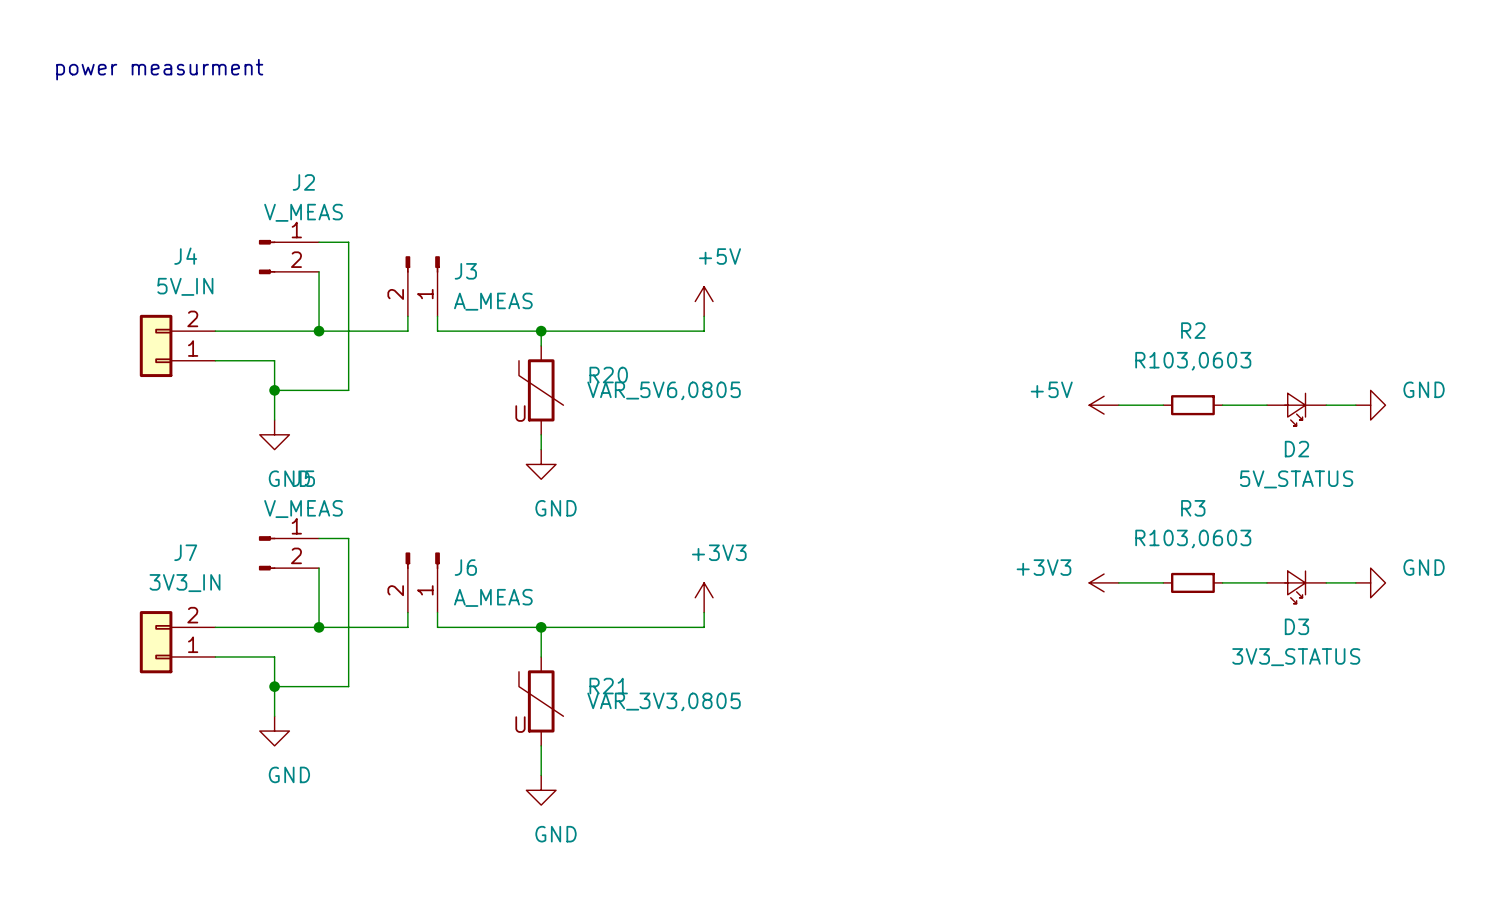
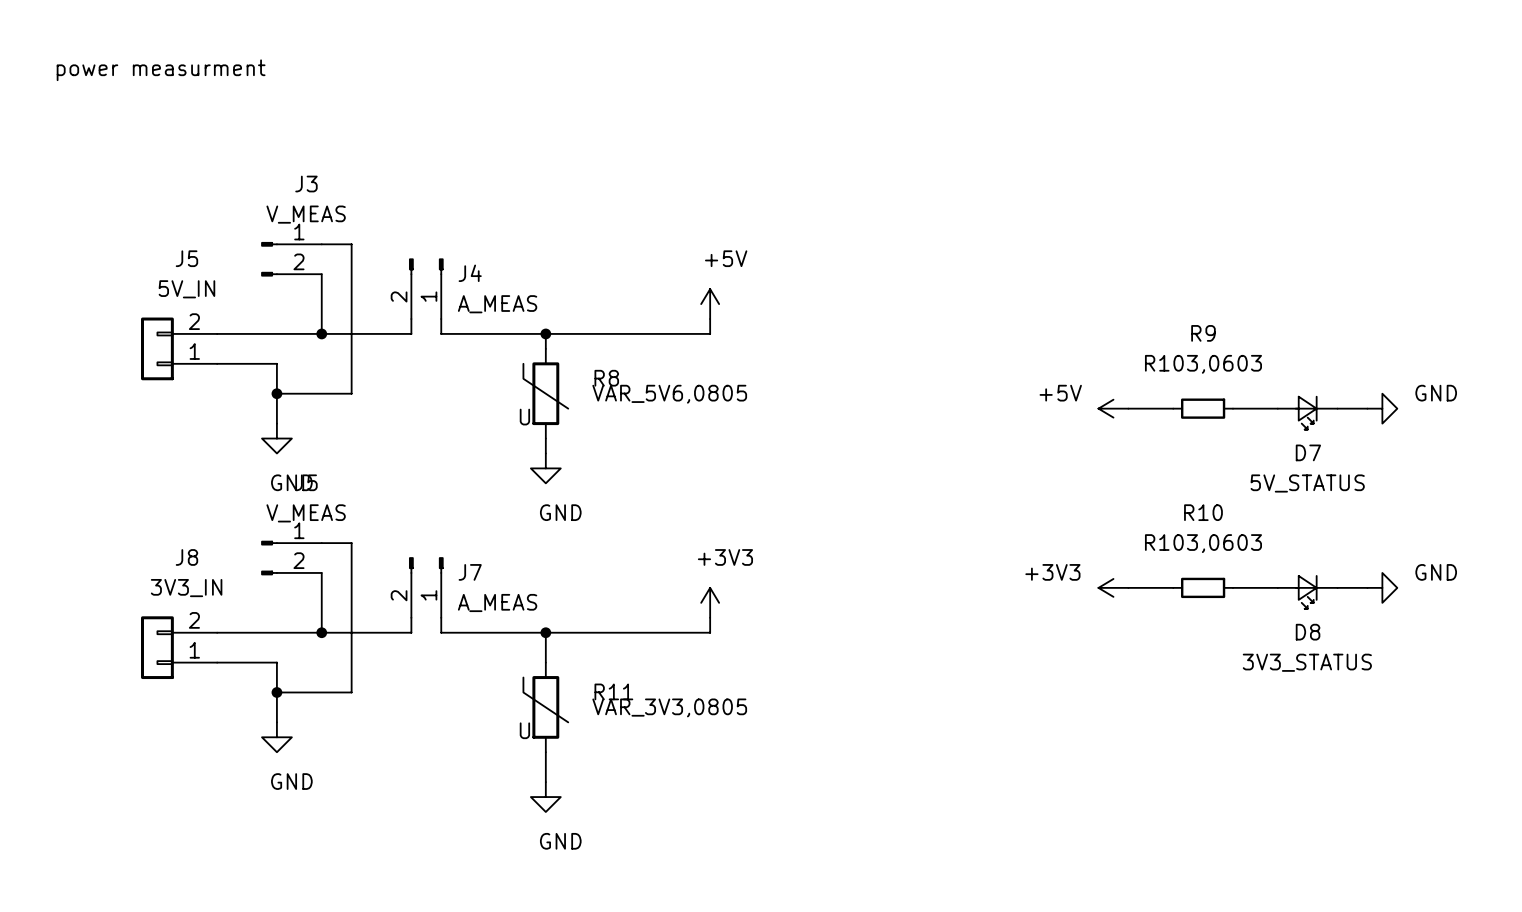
J2 name: J2 (303, 182) -> J3 (306, 184)
J4 name: J4 (185, 256) -> J5 (186, 258)
J3 name: J3 (465, 271) -> J4 (470, 273)
R2 name: R2 (1193, 330) -> R9 (1203, 333)
R20 name: R20 (608, 375) -> R8 (606, 378)
D2 name: D2 (1296, 449) -> D7 (1308, 452)
R3 name: R3 (1193, 508) -> R10 (1203, 512)
J7 name: J7 (185, 552) -> J8 (186, 557)
J6 name: J6 (465, 567) -> J7 (470, 572)
D3 name: D3 (1296, 626) -> D8 (1308, 632)
R21 name: R21 (608, 686) -> R11 (613, 691)

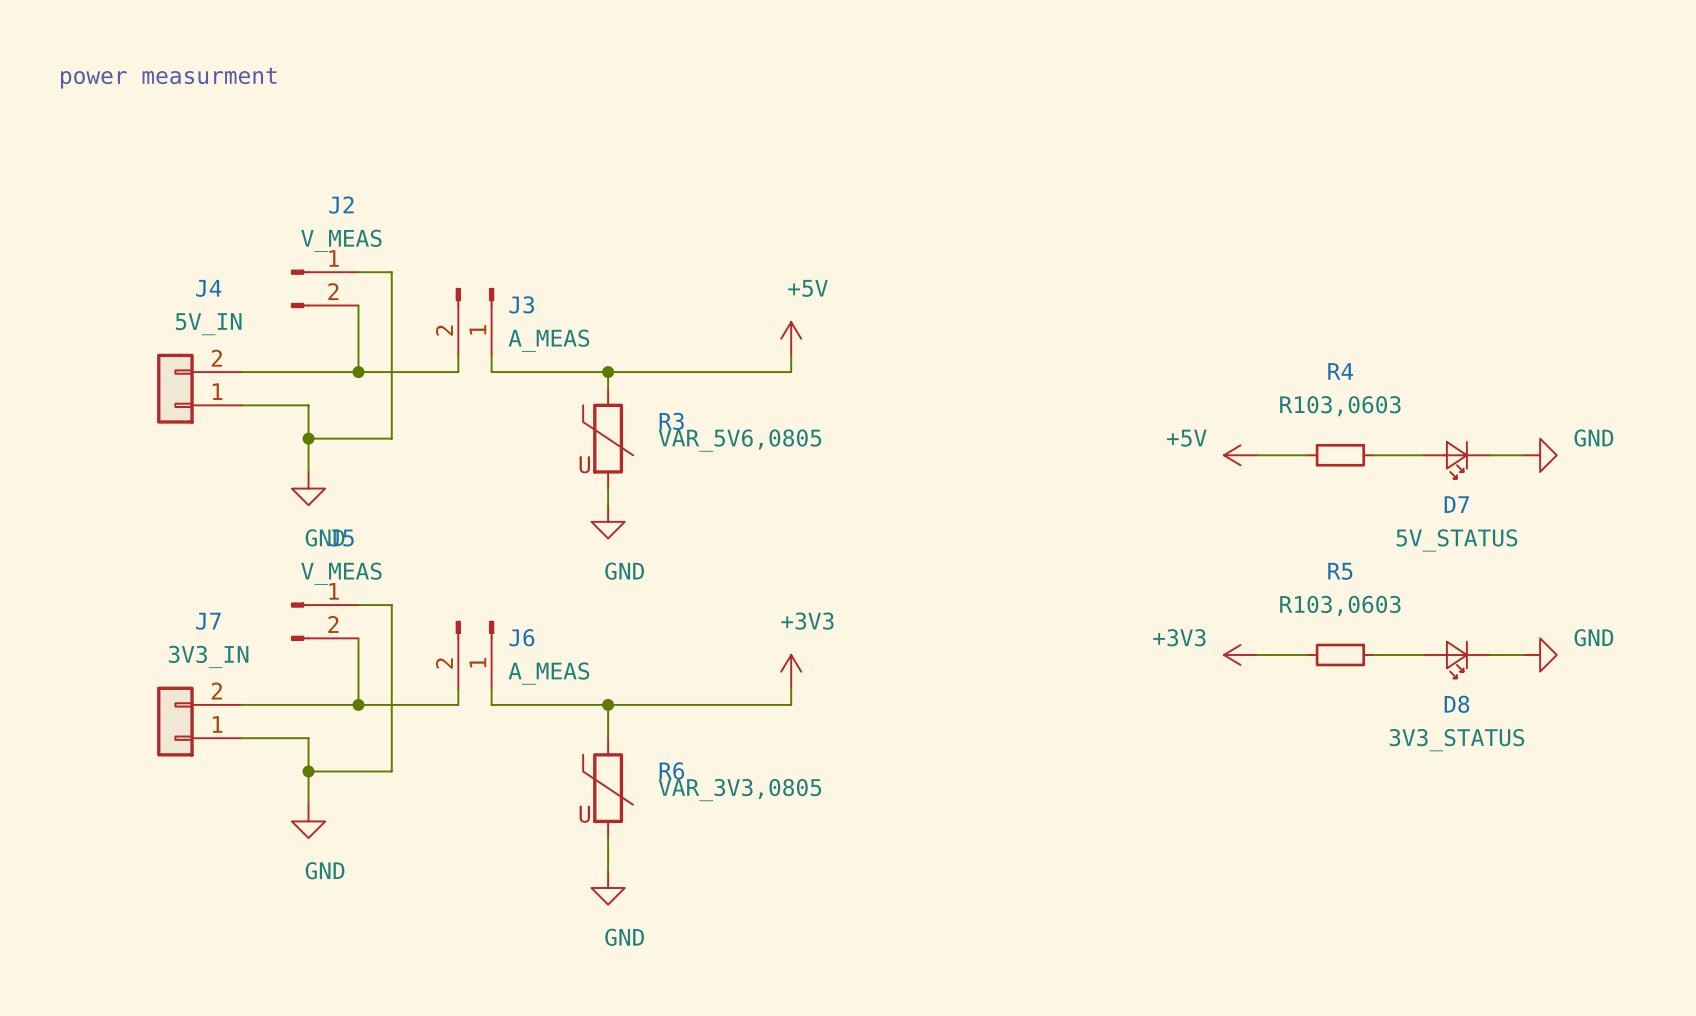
J3 name: J3 (306, 184) -> J2 (341, 205)
J5 name: J5 (186, 258) -> J4 (208, 288)
J4 name: J4 (470, 273) -> J3 (521, 304)
R9 name: R9 (1203, 333) -> R4 (1340, 371)
R8 name: R8 (606, 378) -> R3 (671, 421)
R10 name: R10 (1203, 512) -> R5 (1340, 571)
J8 name: J8 (186, 557) -> J7 (208, 621)
J7 name: J7 (470, 572) -> J6 (521, 637)
R11 name: R11 (613, 691) -> R6 (671, 770)

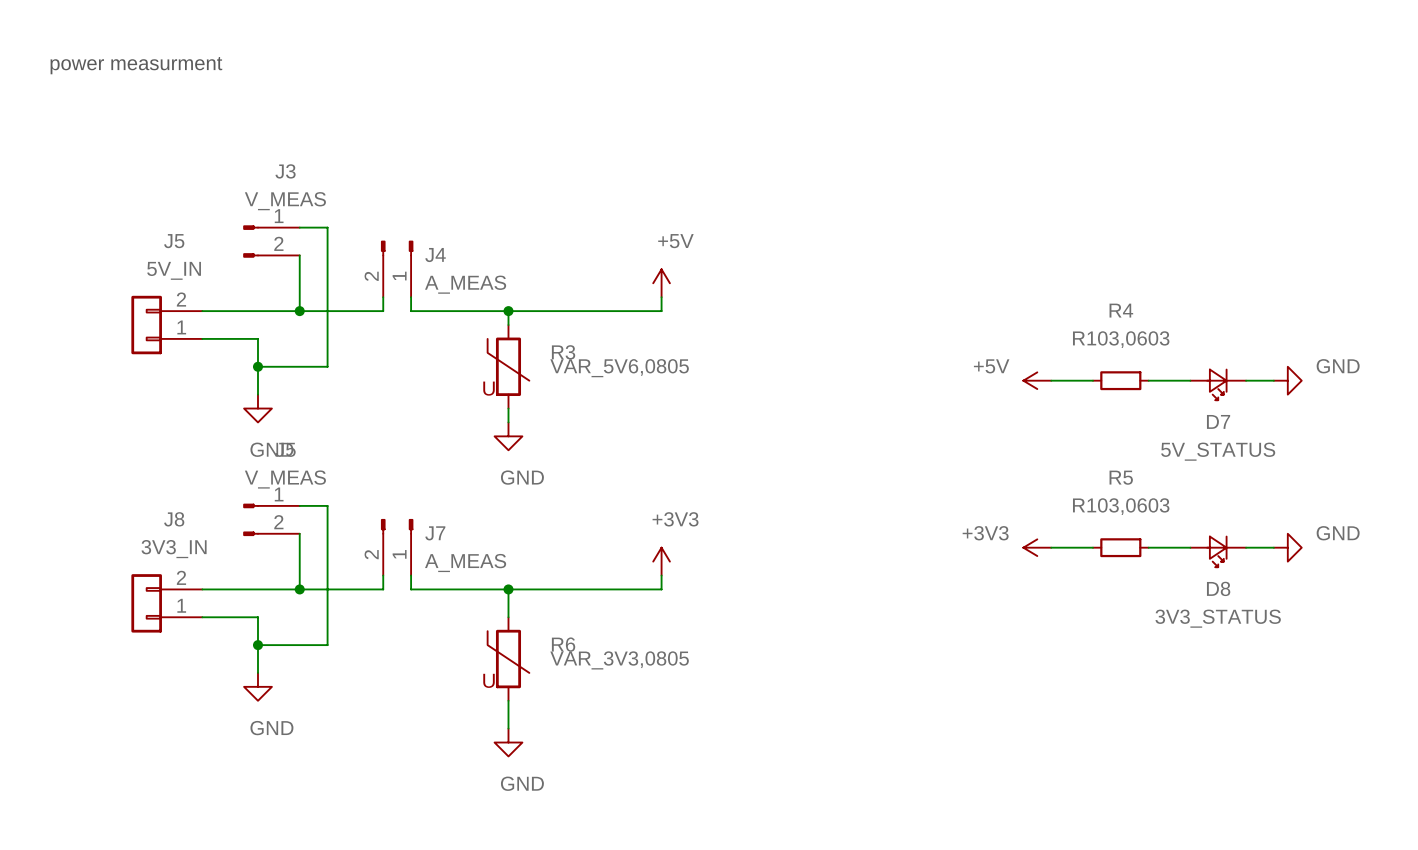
J2 name: J2 (341, 205) -> J3 (285, 171)
J4 name: J4 (208, 288) -> J5 (174, 241)
J3 name: J3 (521, 304) -> J4 (435, 255)
J7 name: J7 (208, 621) -> J8 (174, 519)
J6 name: J6 (521, 637) -> J7 (435, 533)

